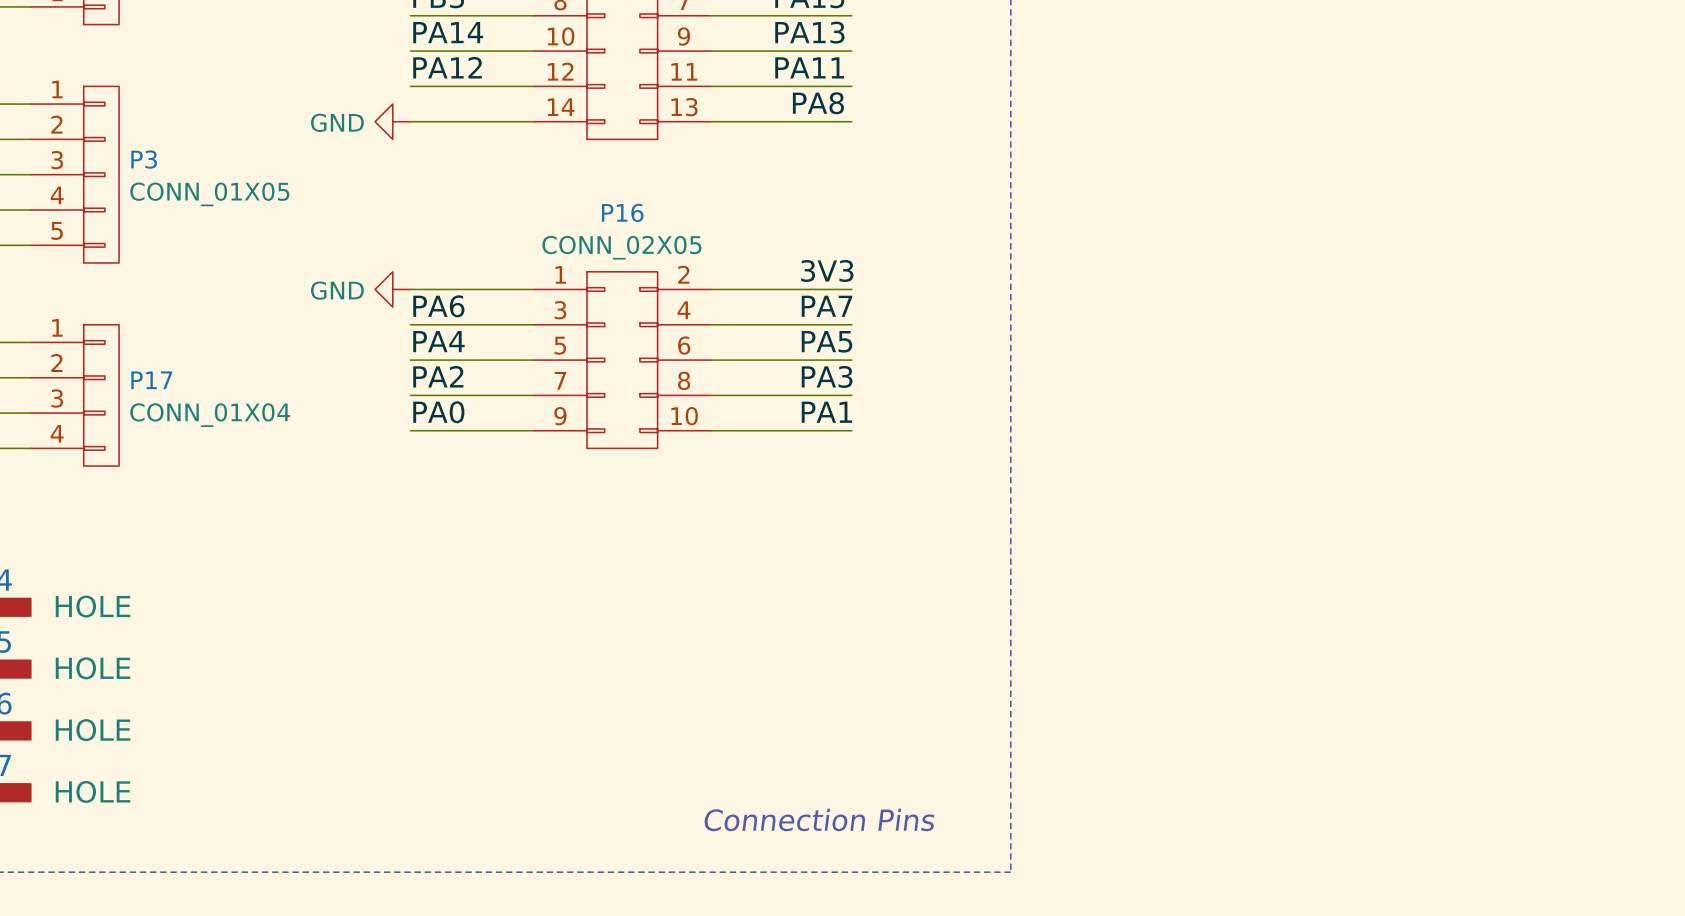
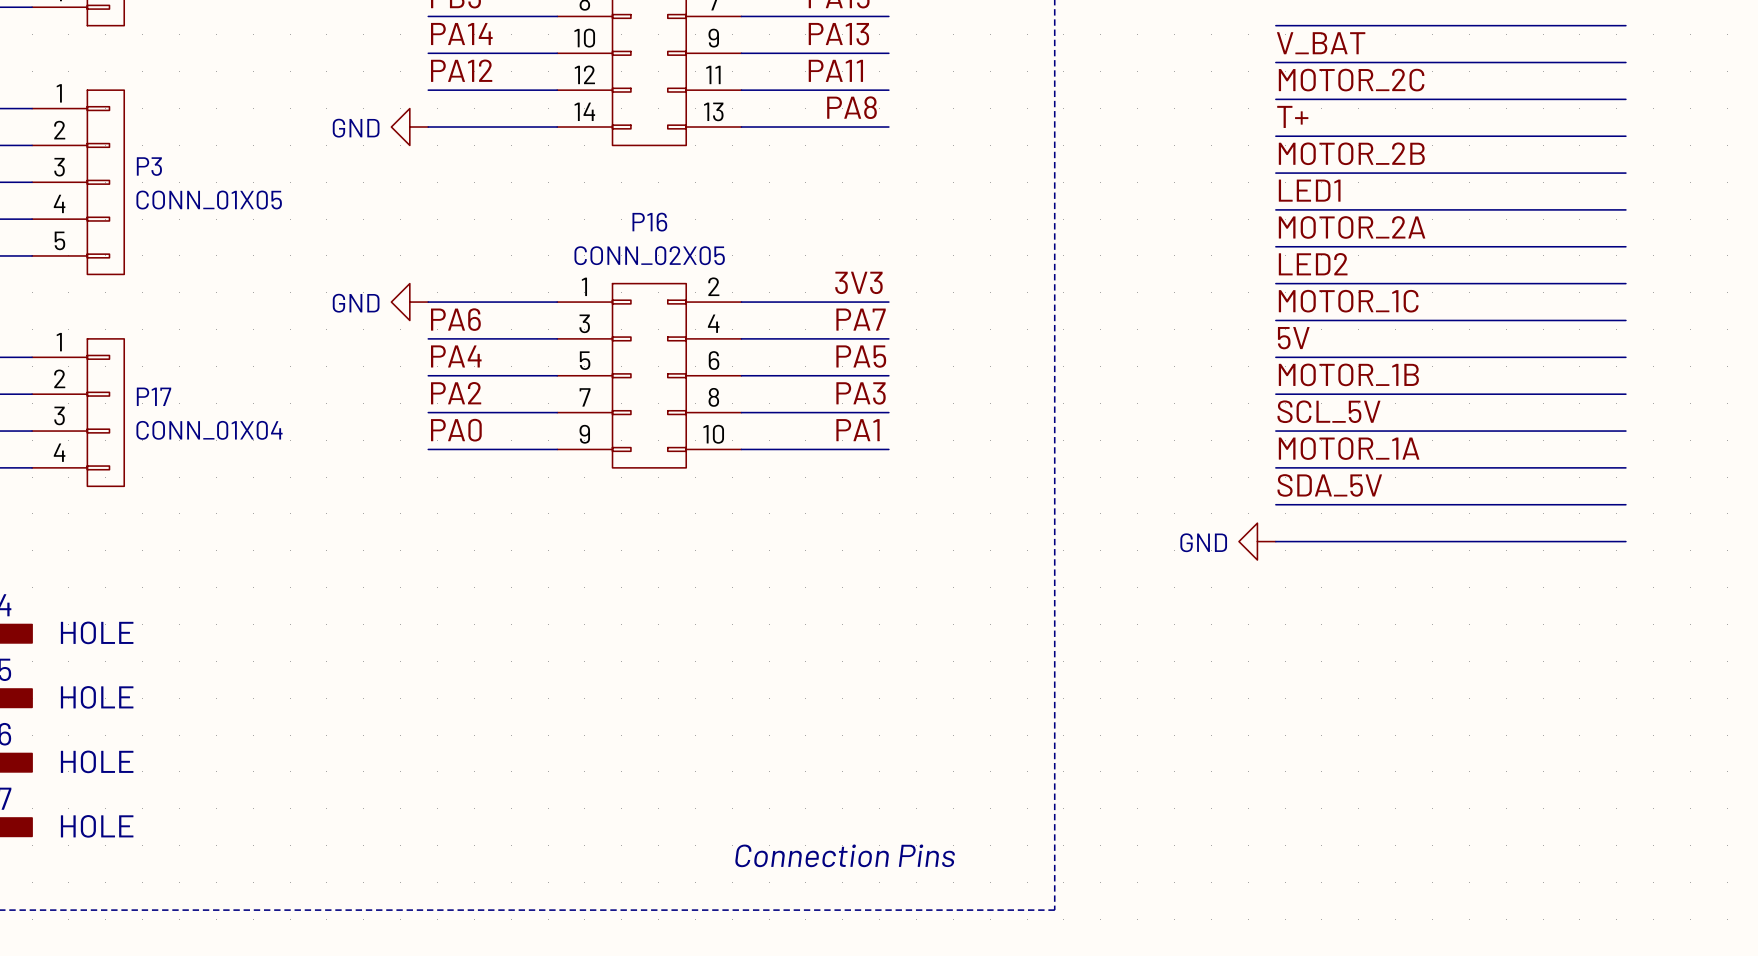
wire: none -> (1275, 25) (1625, 25)
label: none -> V_BAT (1321, 43)
wire: none -> (1275, 62) (1625, 62)
label: none -> MOTOR_2C (1351, 80)
wire: none -> (1275, 99) (1625, 99)
label: none -> T+ (1292, 116)
wire: none -> (1275, 136) (1625, 136)
label: none -> MOTOR_2B (1351, 153)
wire: none -> (1275, 173) (1625, 173)
label: none -> LED1 (1309, 190)
wire: none -> (1275, 209) (1625, 209)
label: none -> MOTOR_2A (1352, 227)
wire: none -> (1275, 246) (1625, 246)
label: none -> LED2 (1313, 264)
wire: none -> (1275, 283) (1625, 283)
label: none -> MOTOR_1C (1348, 301)
wire: none -> (1275, 320) (1625, 320)
label: none -> 5V (1293, 338)
wire: none -> (1275, 357) (1625, 357)
label: none -> MOTOR_1B (1348, 374)
wire: none -> (1275, 394) (1625, 394)
label: none -> SCL_5V (1328, 411)
wire: none -> (1275, 431) (1625, 431)
label: none -> MOTOR_1A (1349, 448)
wire: none -> (1275, 467) (1625, 467)
label: none -> SDA_5V (1329, 485)
wire: none -> (1275, 504) (1625, 504)
power symbol: none -> GND (1257, 541)
wire: none -> (1275, 541) (1625, 541)

